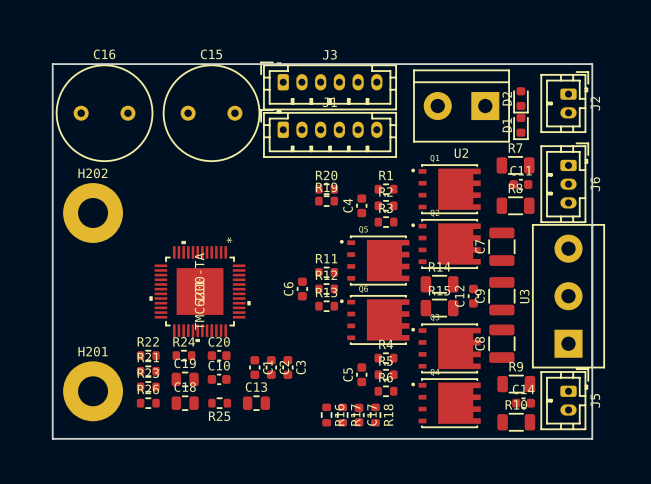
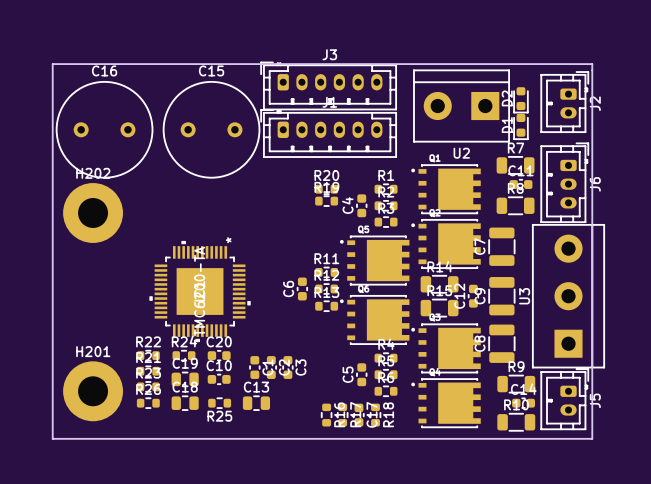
C16 position: (104, 113) -> (104, 129)
C15 position: (211, 113) -> (211, 129)

